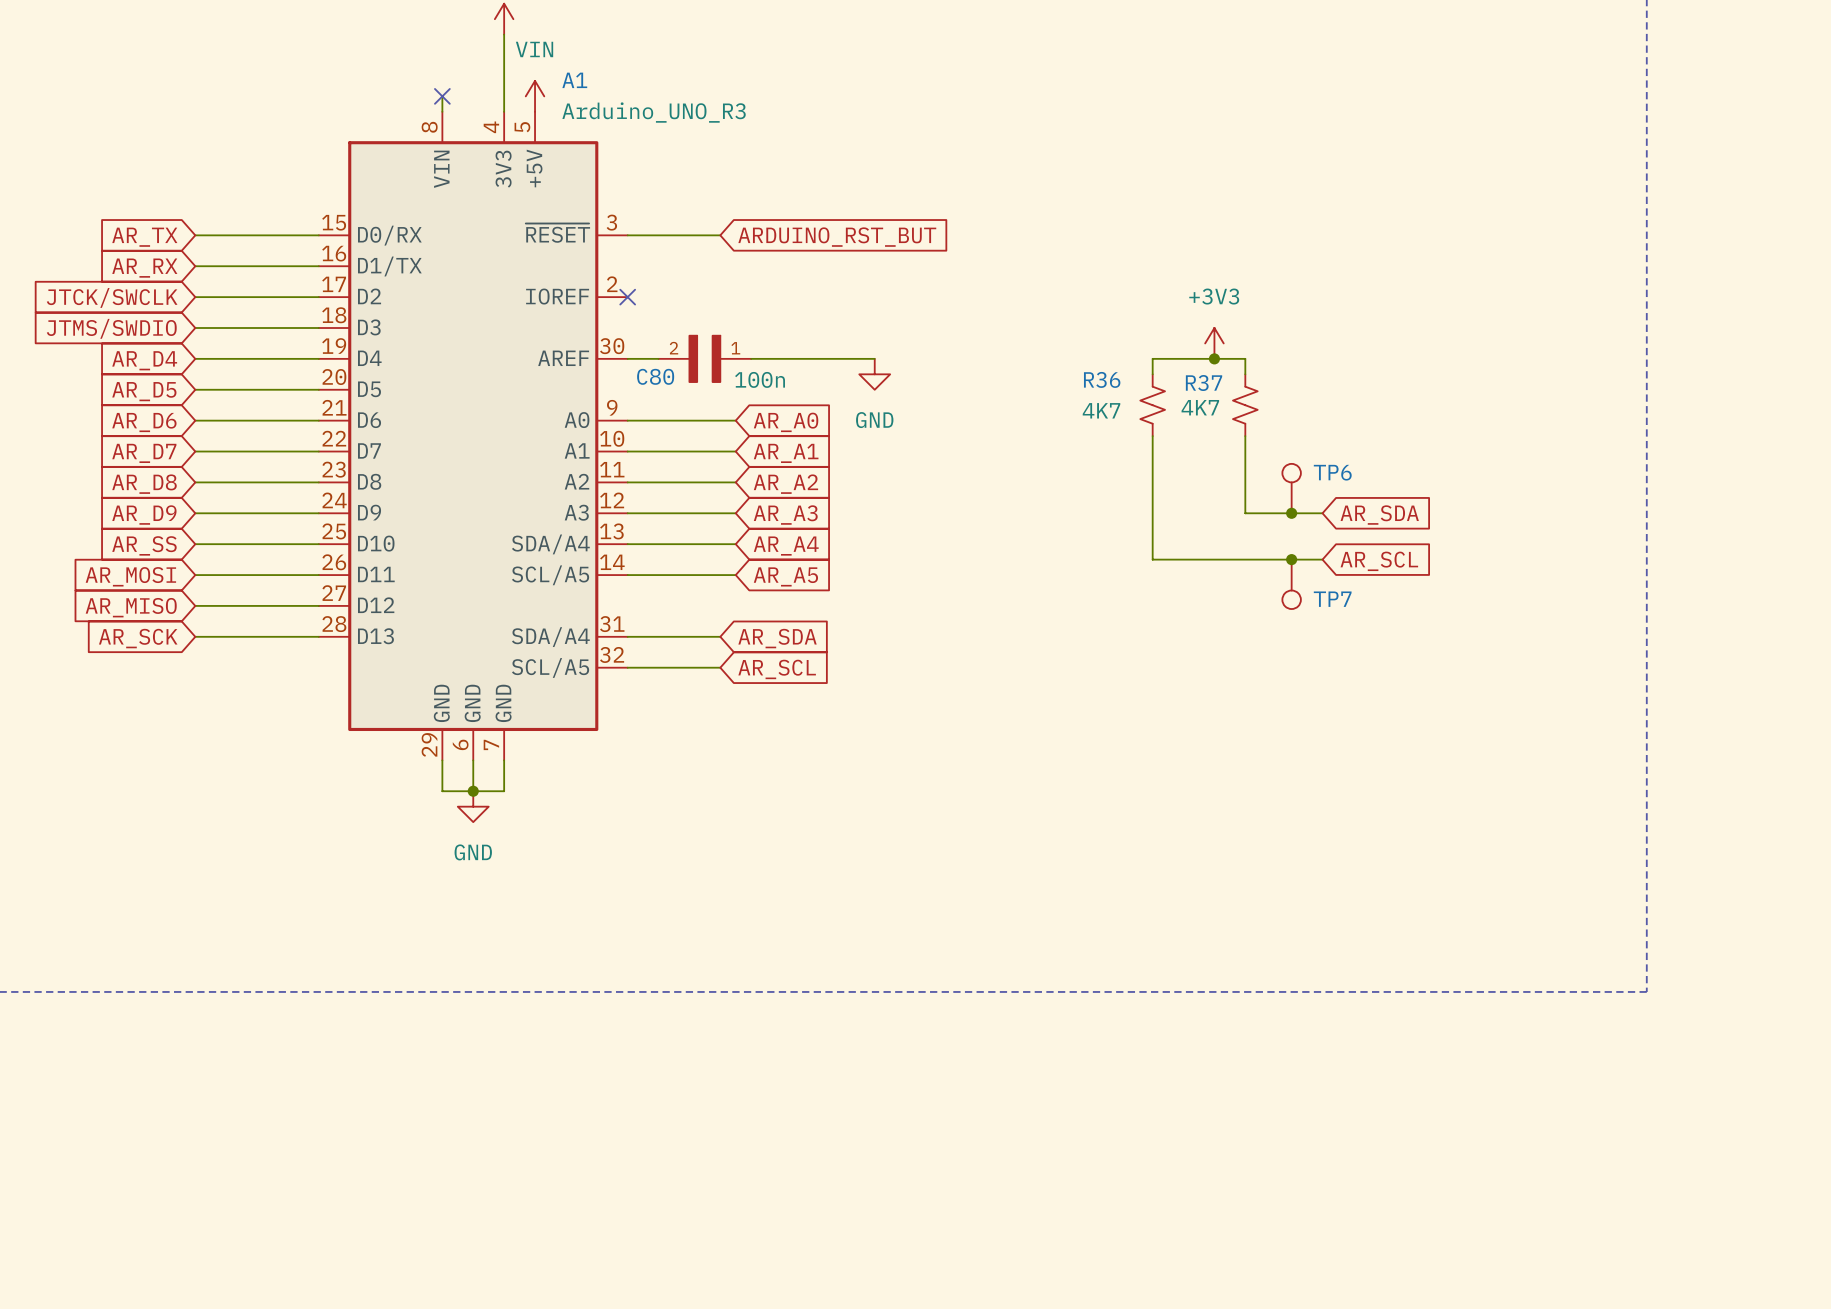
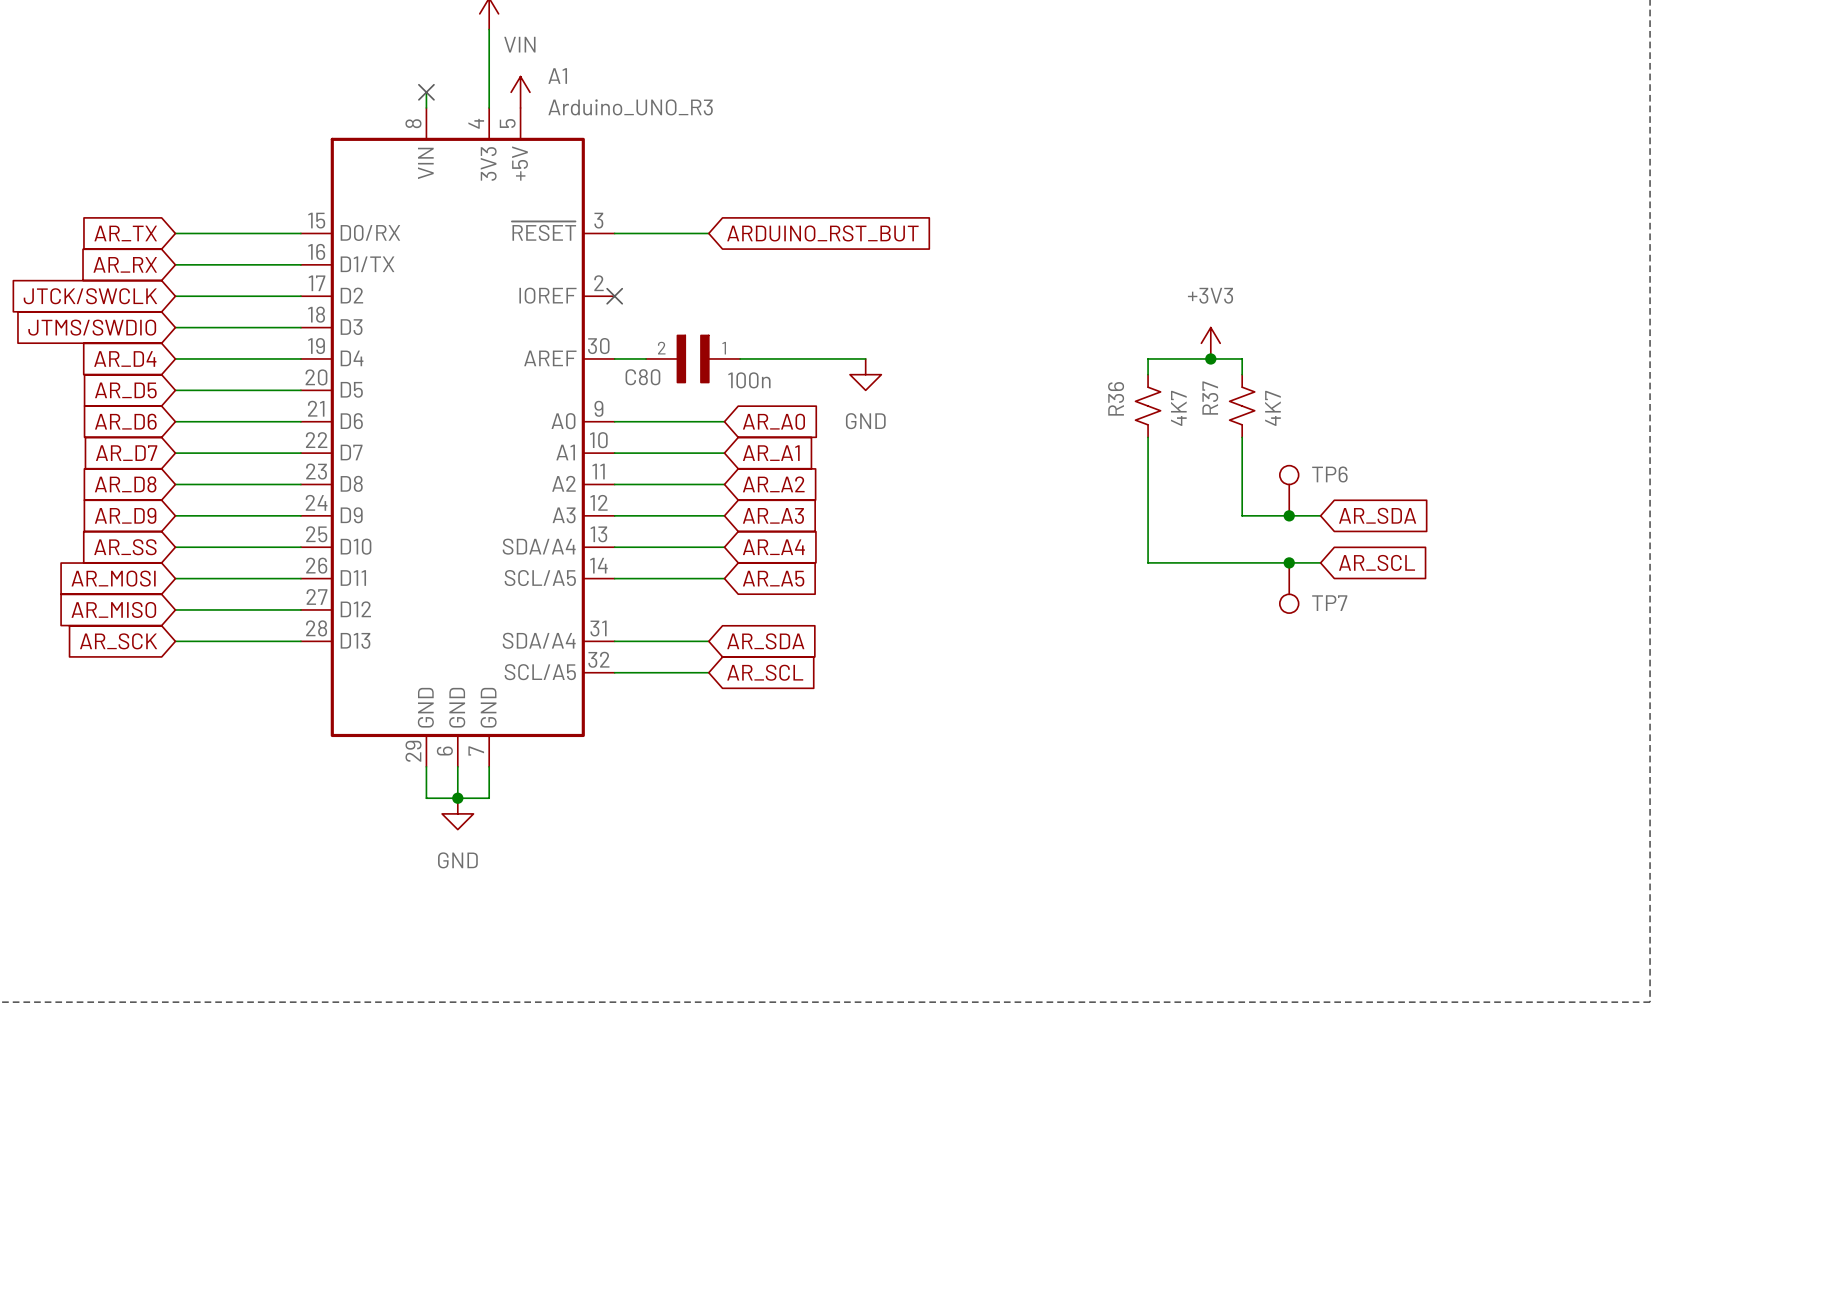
R36 name rotation: 0° (1102, 379) -> 90° counterclockwise (1116, 398)
R37 name rotation: 0° (1204, 383) -> 90° counterclockwise (1210, 398)
R37 value rotation: 0° (1200, 407) -> 90° counterclockwise (1272, 408)
R37 value position: 4K7 (1200, 407) -> 4K7 (1272, 408)
R36 value rotation: 0° (1101, 410) -> 90° counterclockwise (1178, 408)
R36 value position: 4K7 (1101, 410) -> 4K7 (1178, 408)

